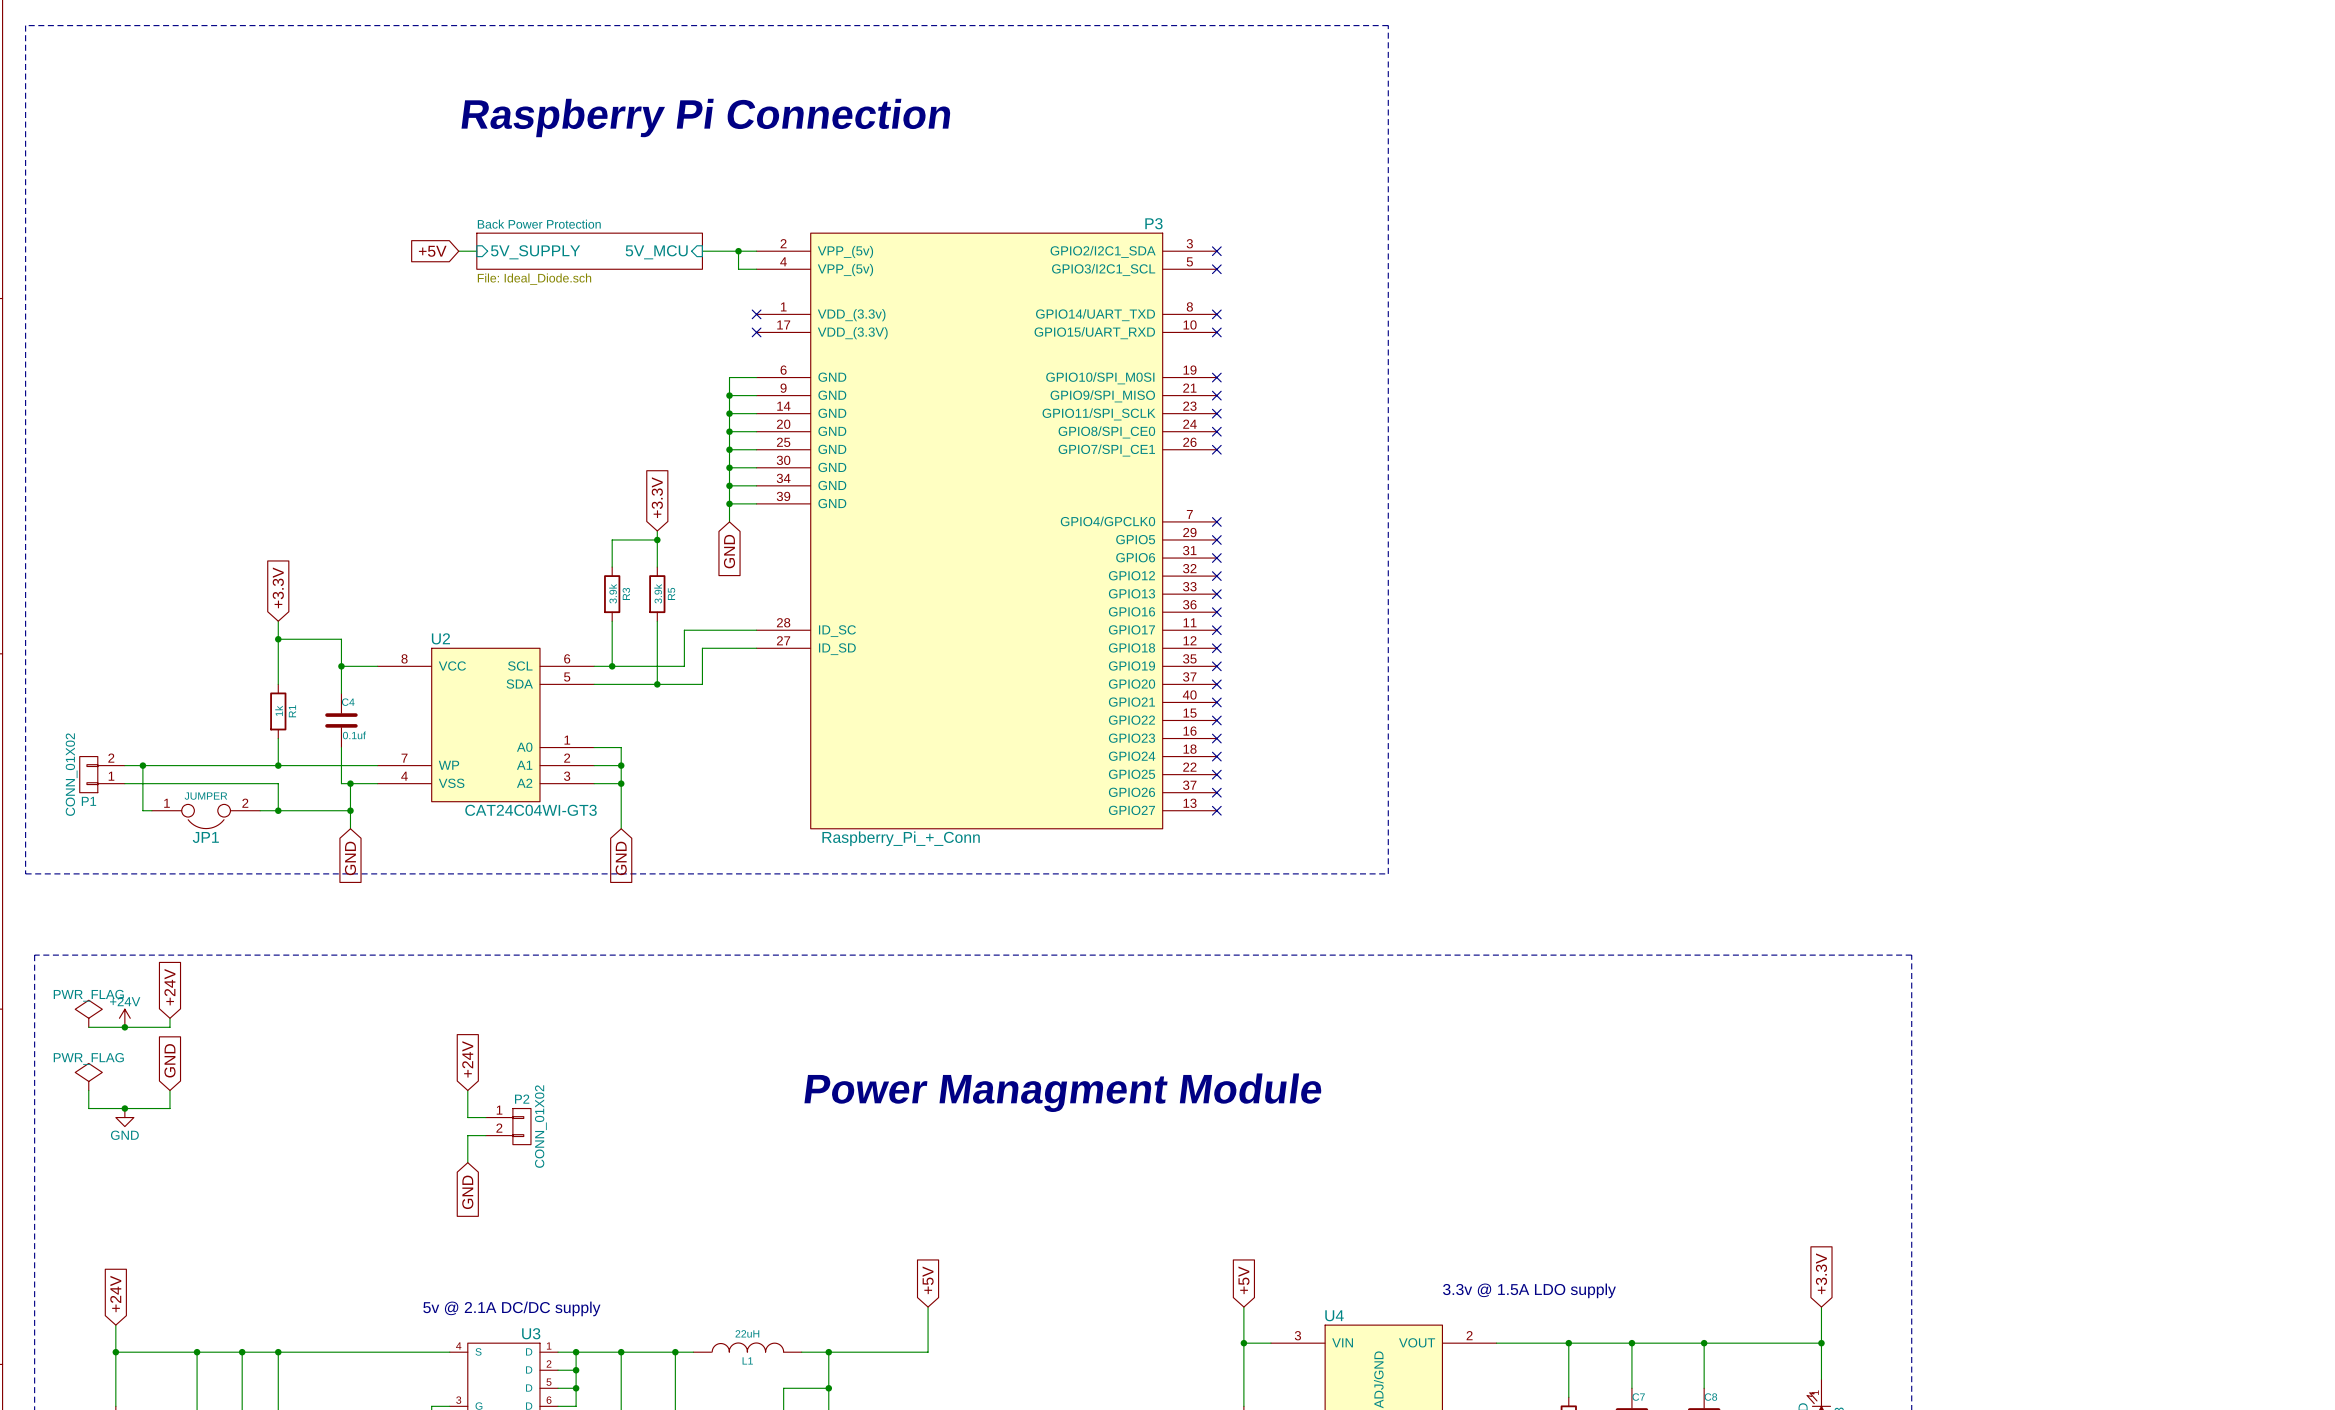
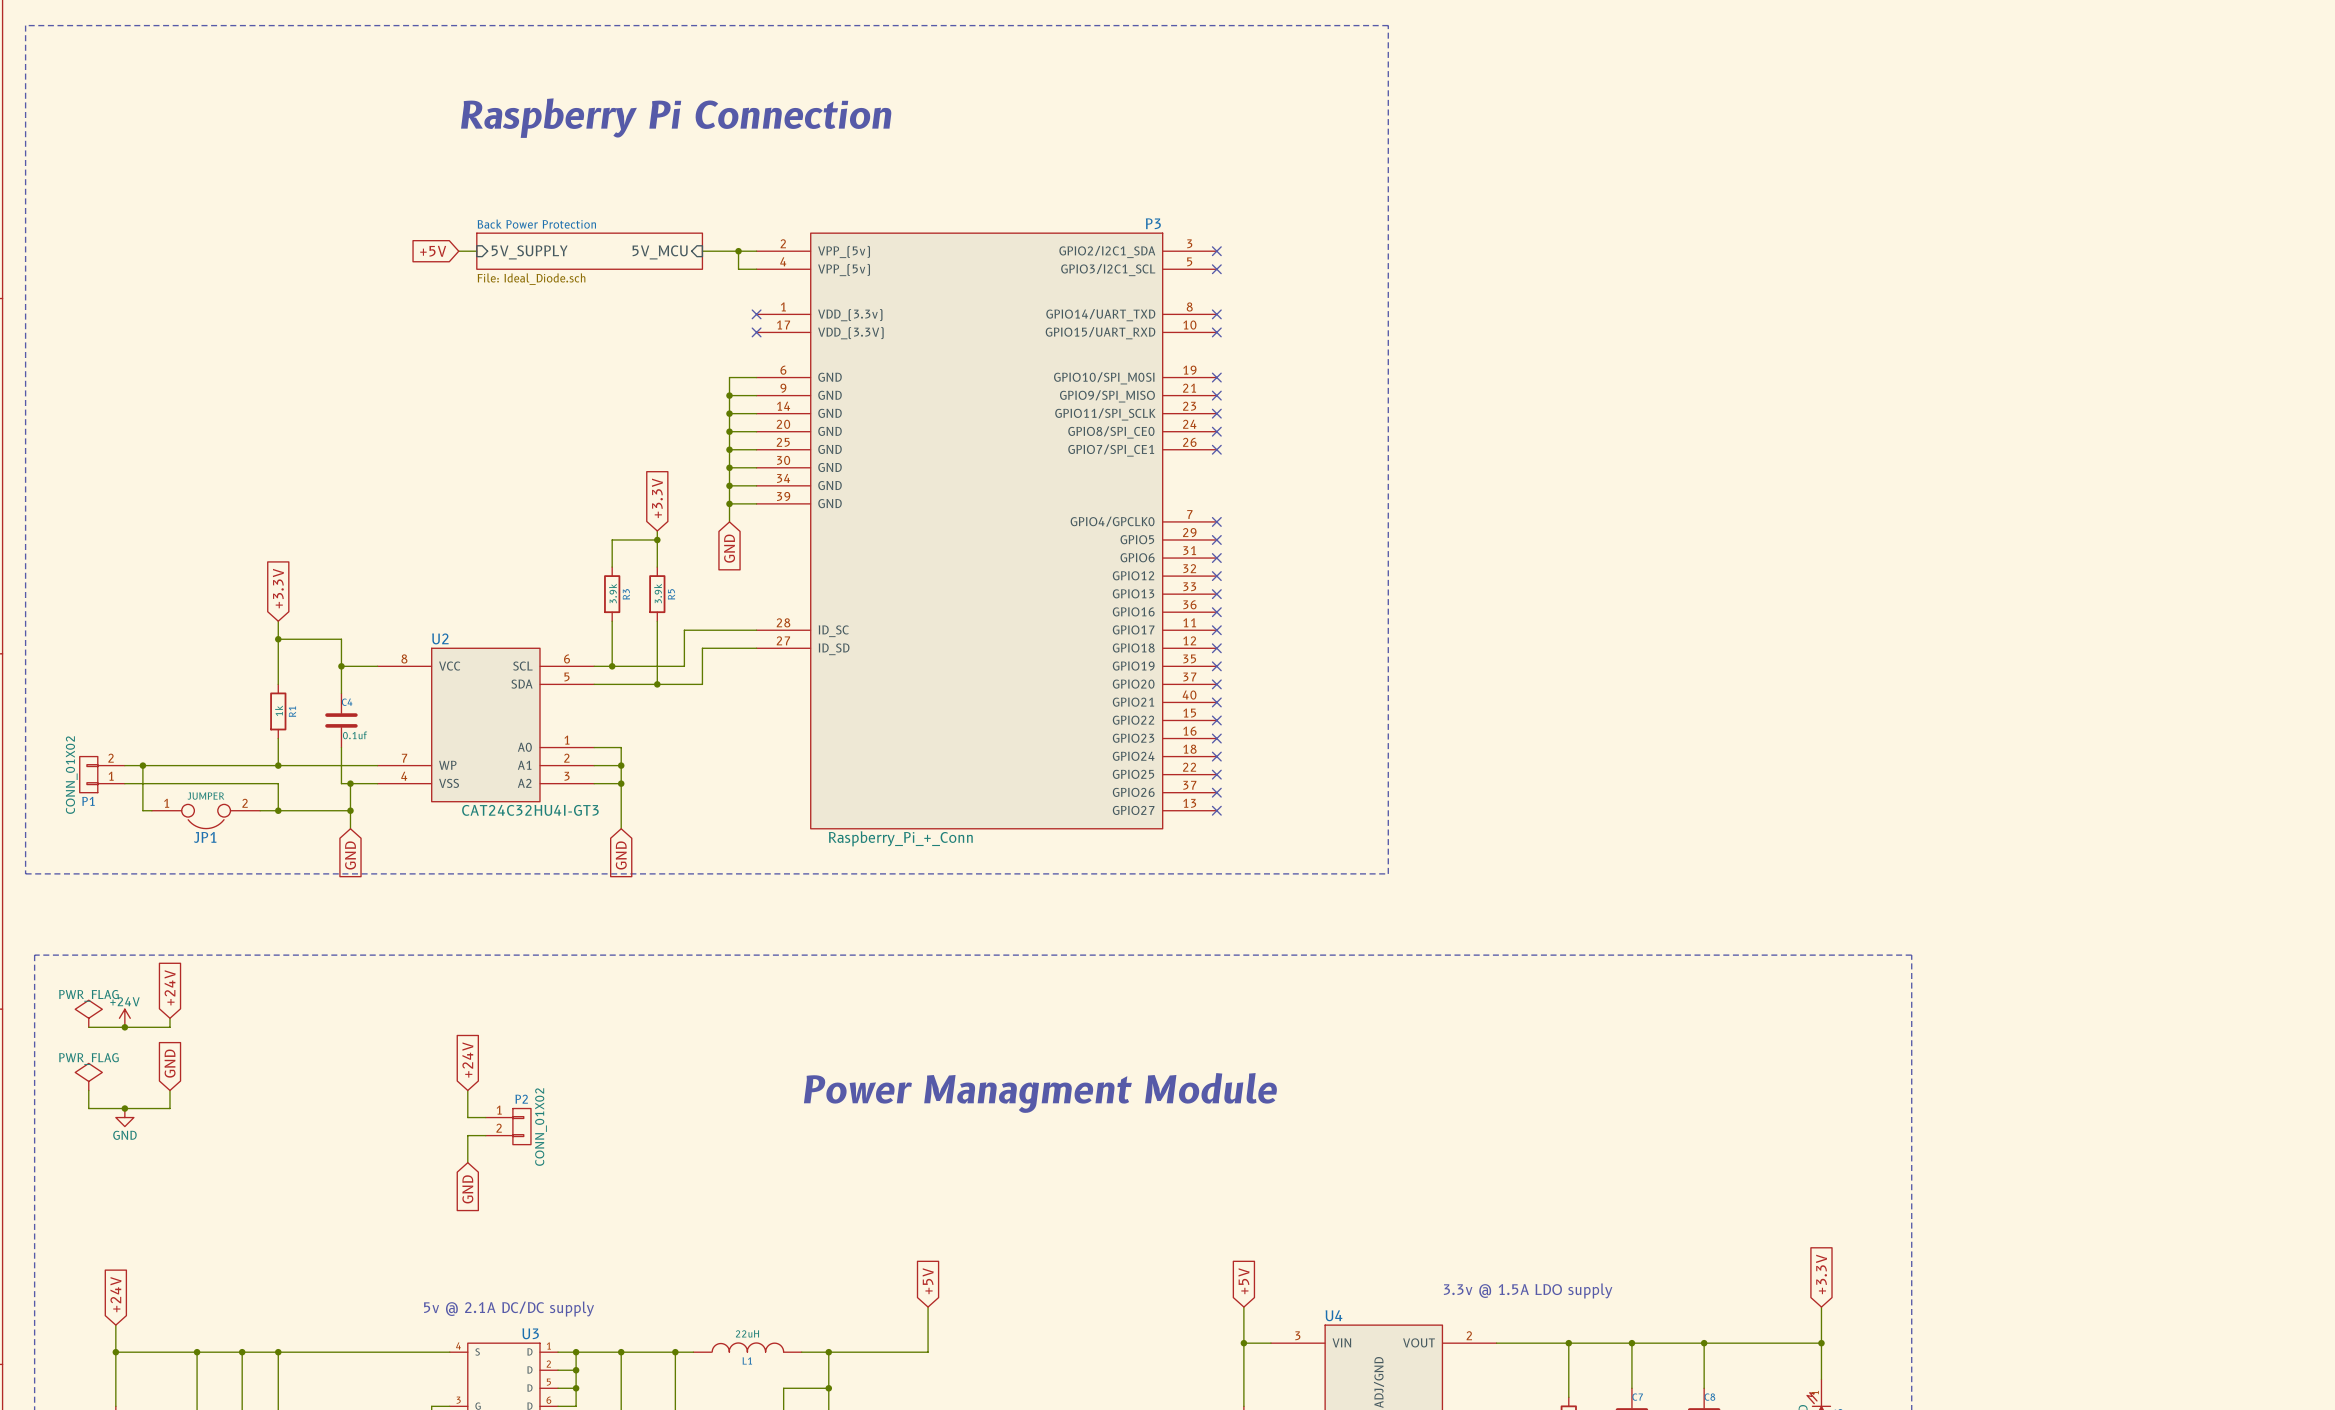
U2 value: CAT24C04WI-GT3 (531, 810) -> CAT24C32HU4I-GT3 (530, 810)

